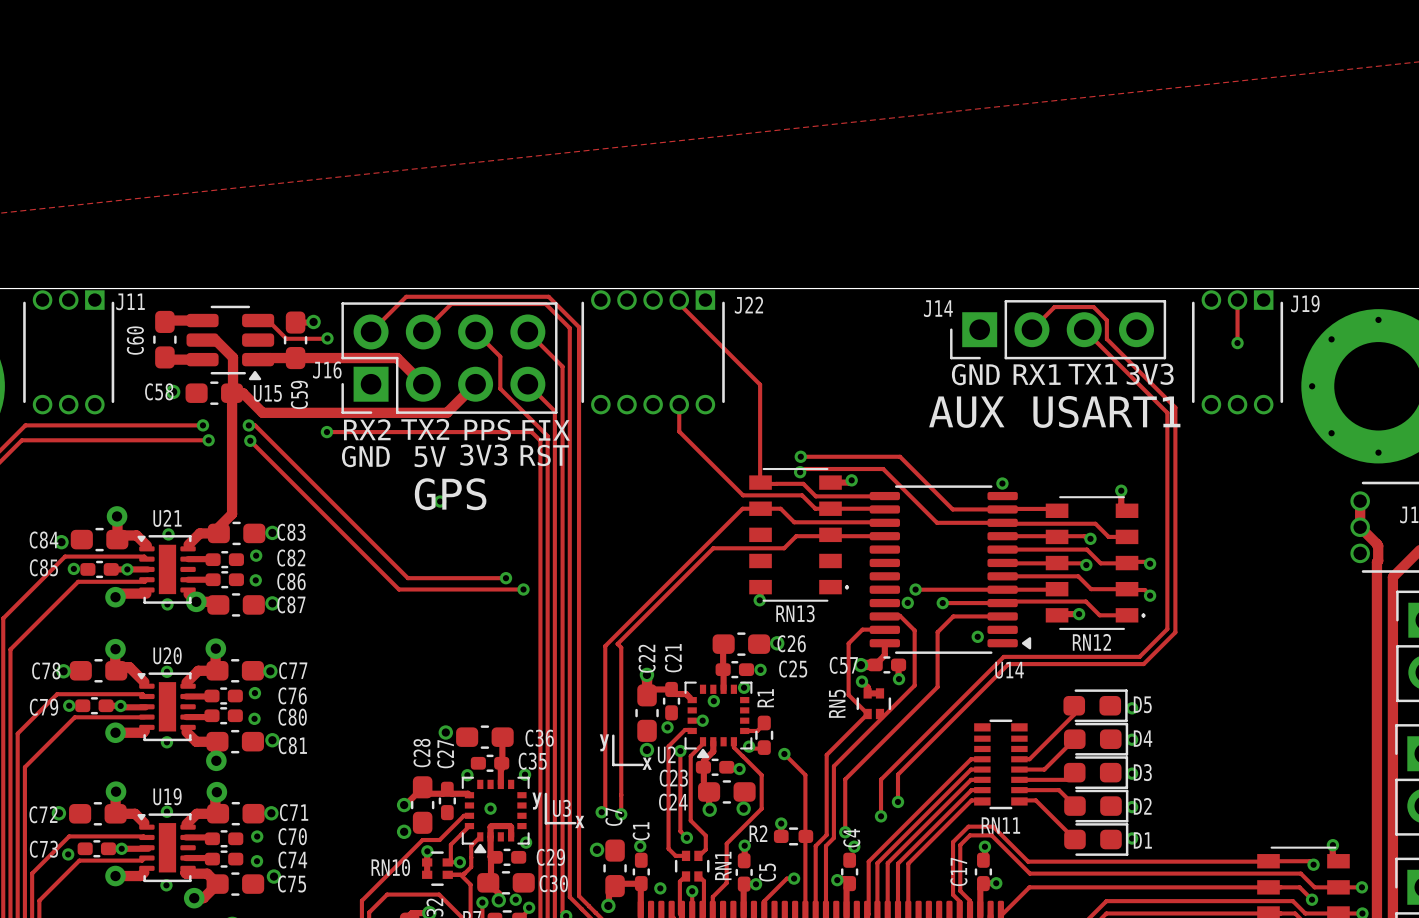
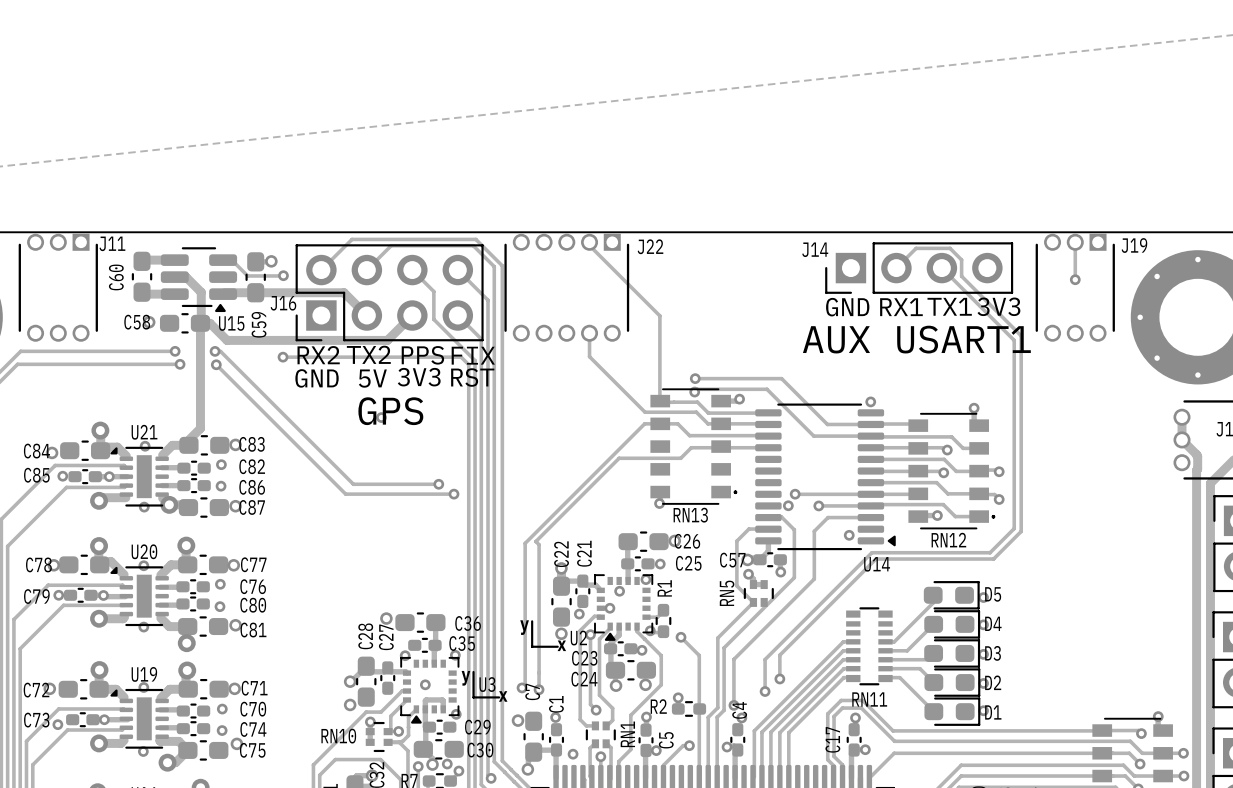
U21 footprint: [137, 535, 196, 604] -> [110, 446, 169, 507]
U20 footprint: [137, 672, 196, 742] -> [110, 566, 169, 627]
U19 footprint: [137, 813, 196, 883] -> [110, 688, 169, 749]

